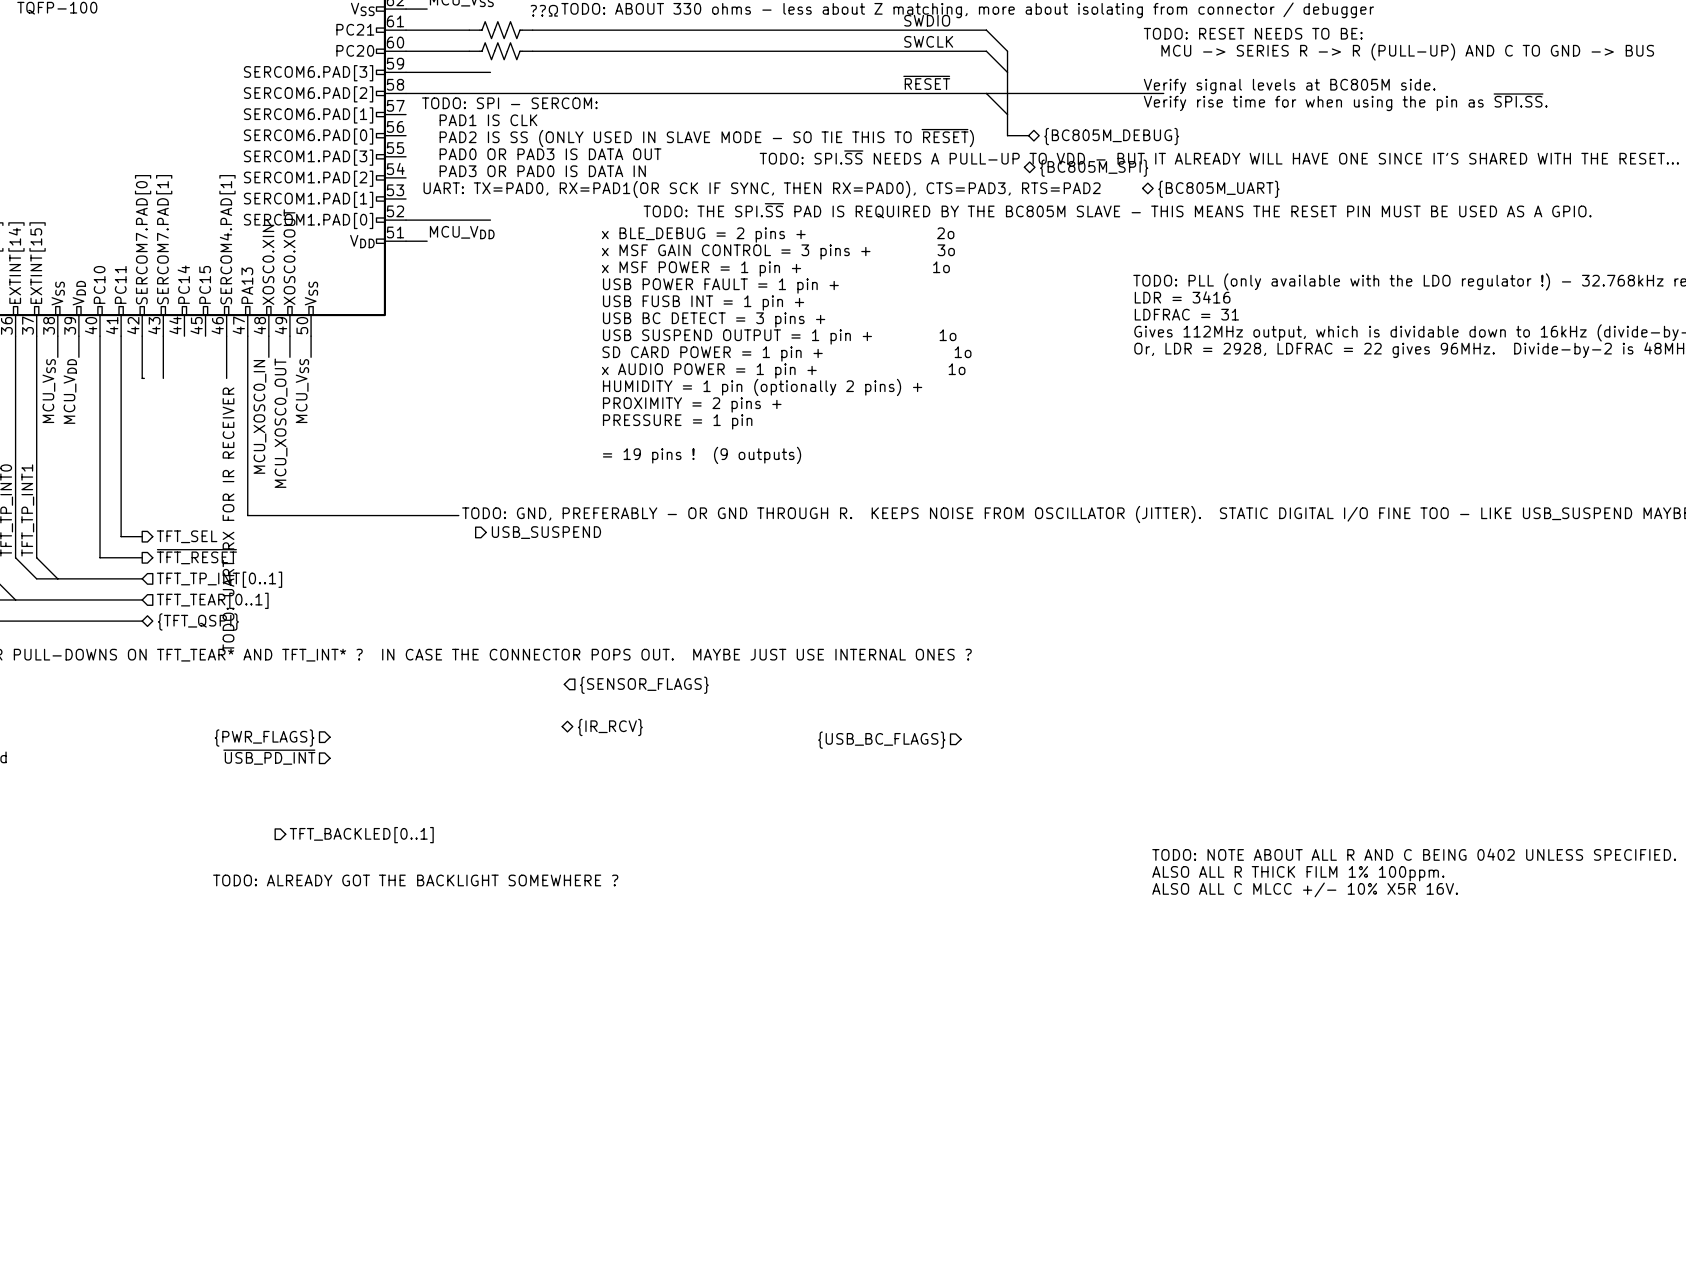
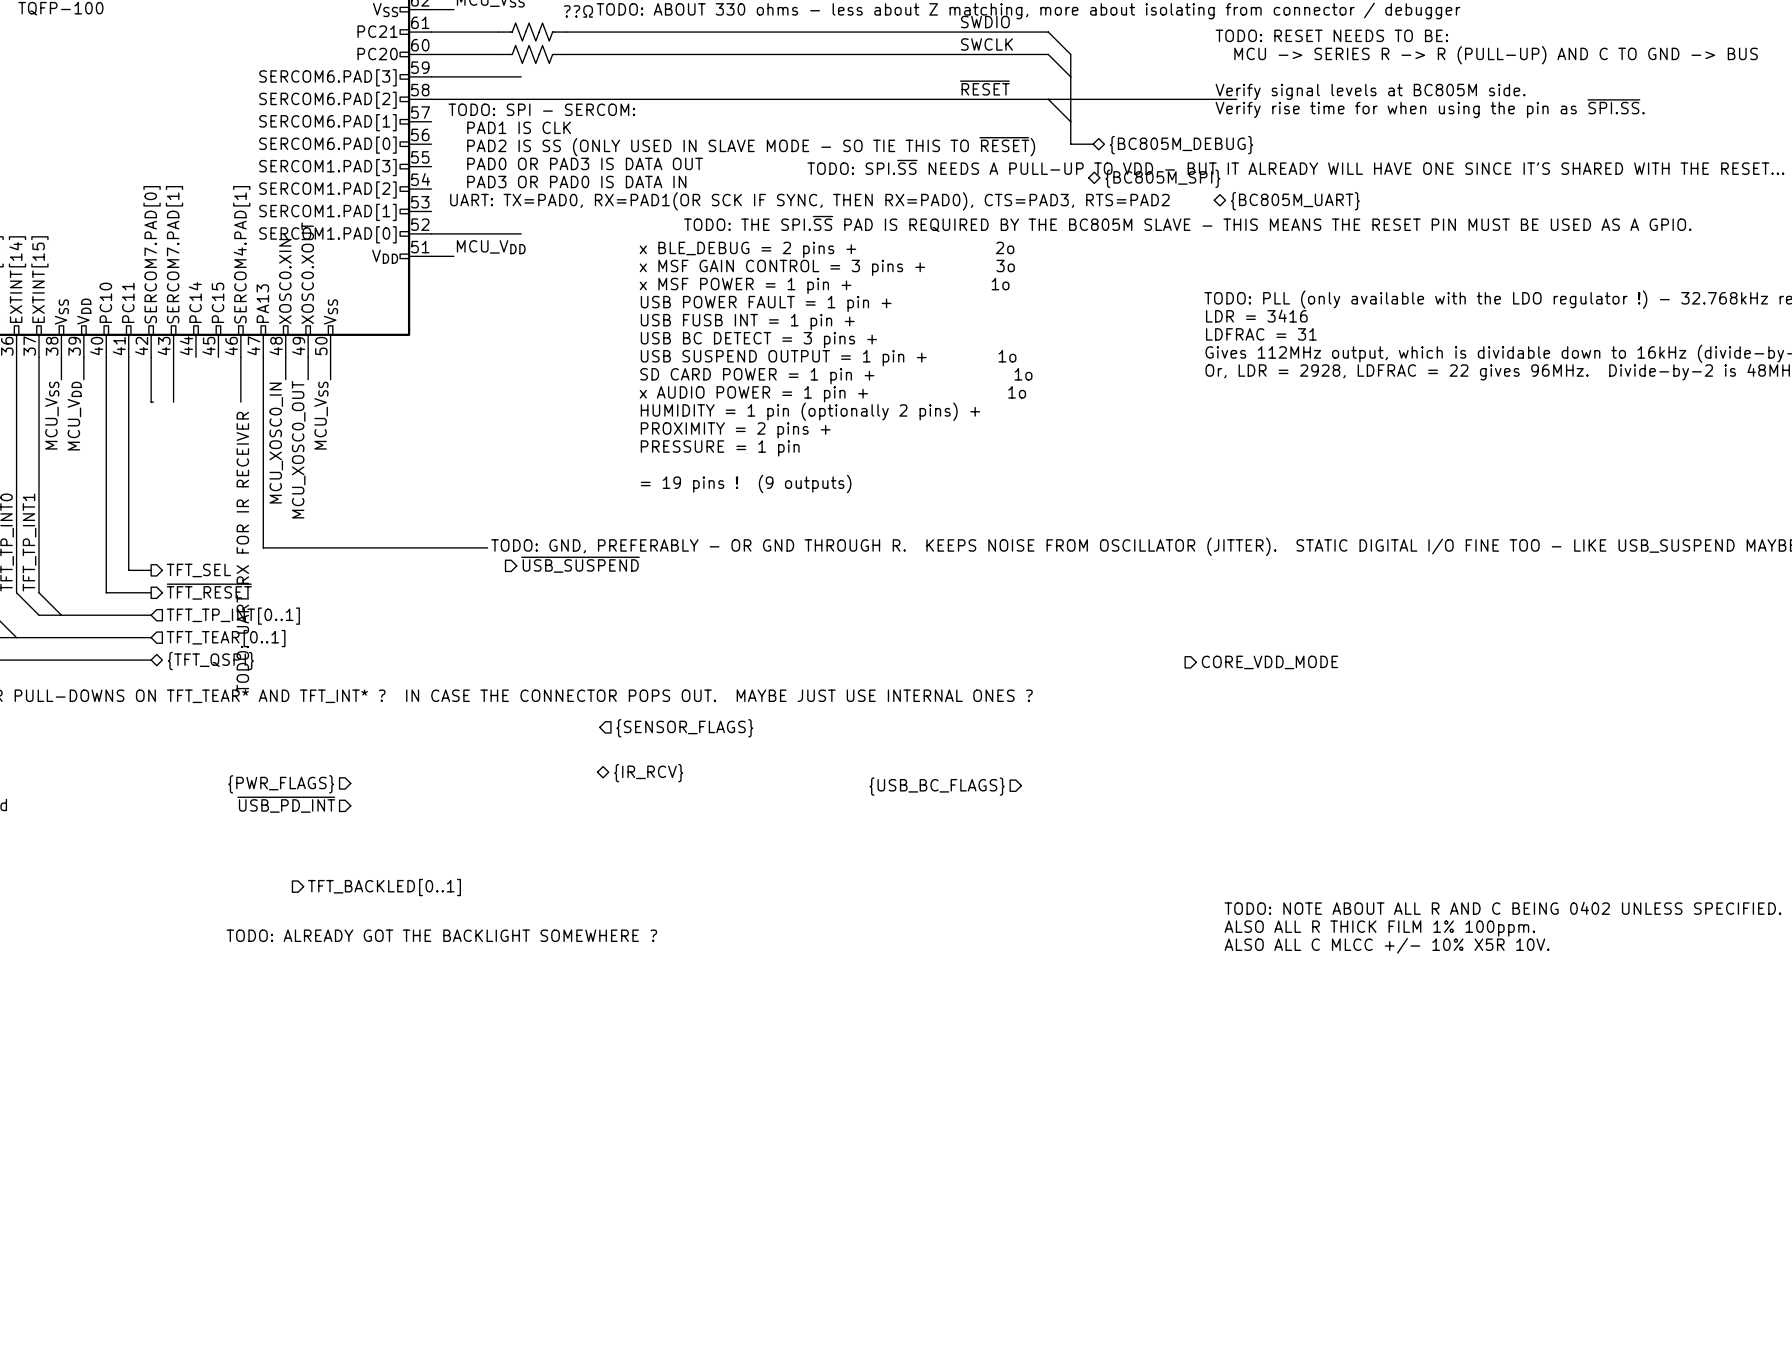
hierarchical label: USB_SUSPEND (546, 532) -> ~{USB_SUSPEND} (580, 564)
hierarchical label: none -> CORE_VDD_MODE (1269, 662)
text: ALSO ALL C MLCC +/- 10% X5R 16V. (1305, 889) -> ALSO ALL C MLCC +/- 10% X5R 10V. (1387, 945)

